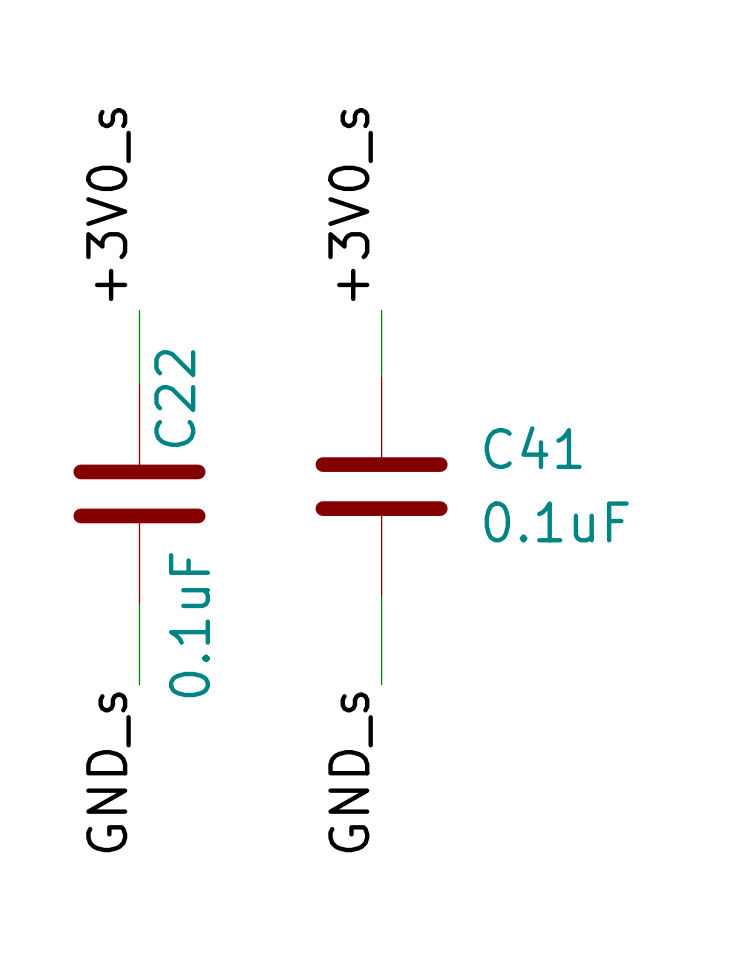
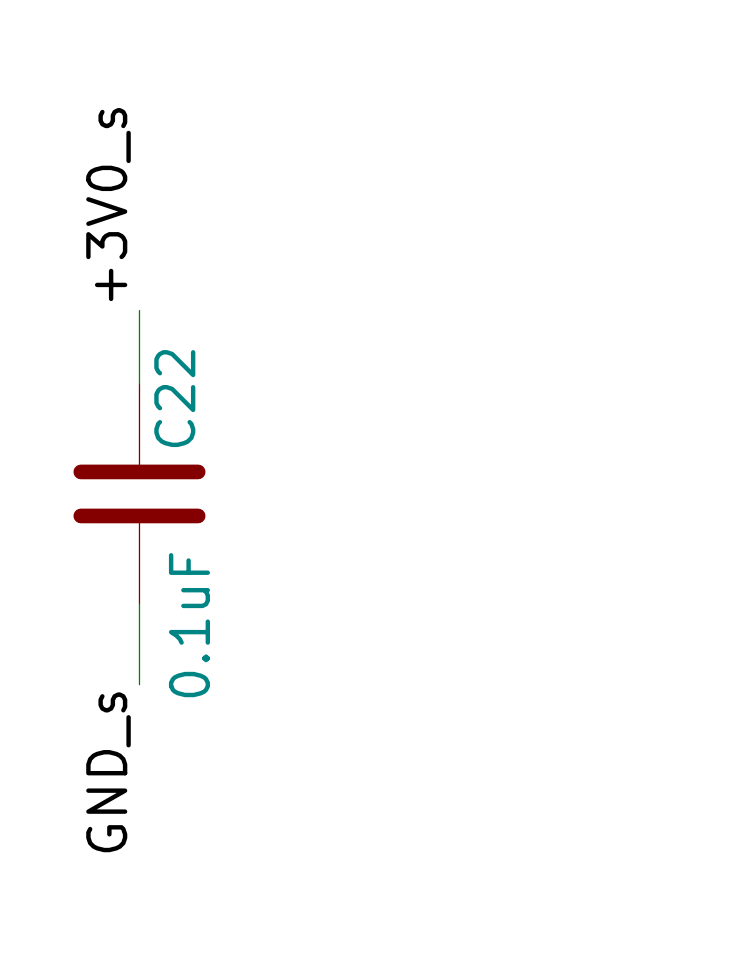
label: +3V0_s (350, 204) -> none
wire: (381, 310) (381, 376) -> none
C41: 0.1uF (381, 486) -> none
wire: (381, 596) (381, 684) -> none
label: GND_s (350, 772) -> none

